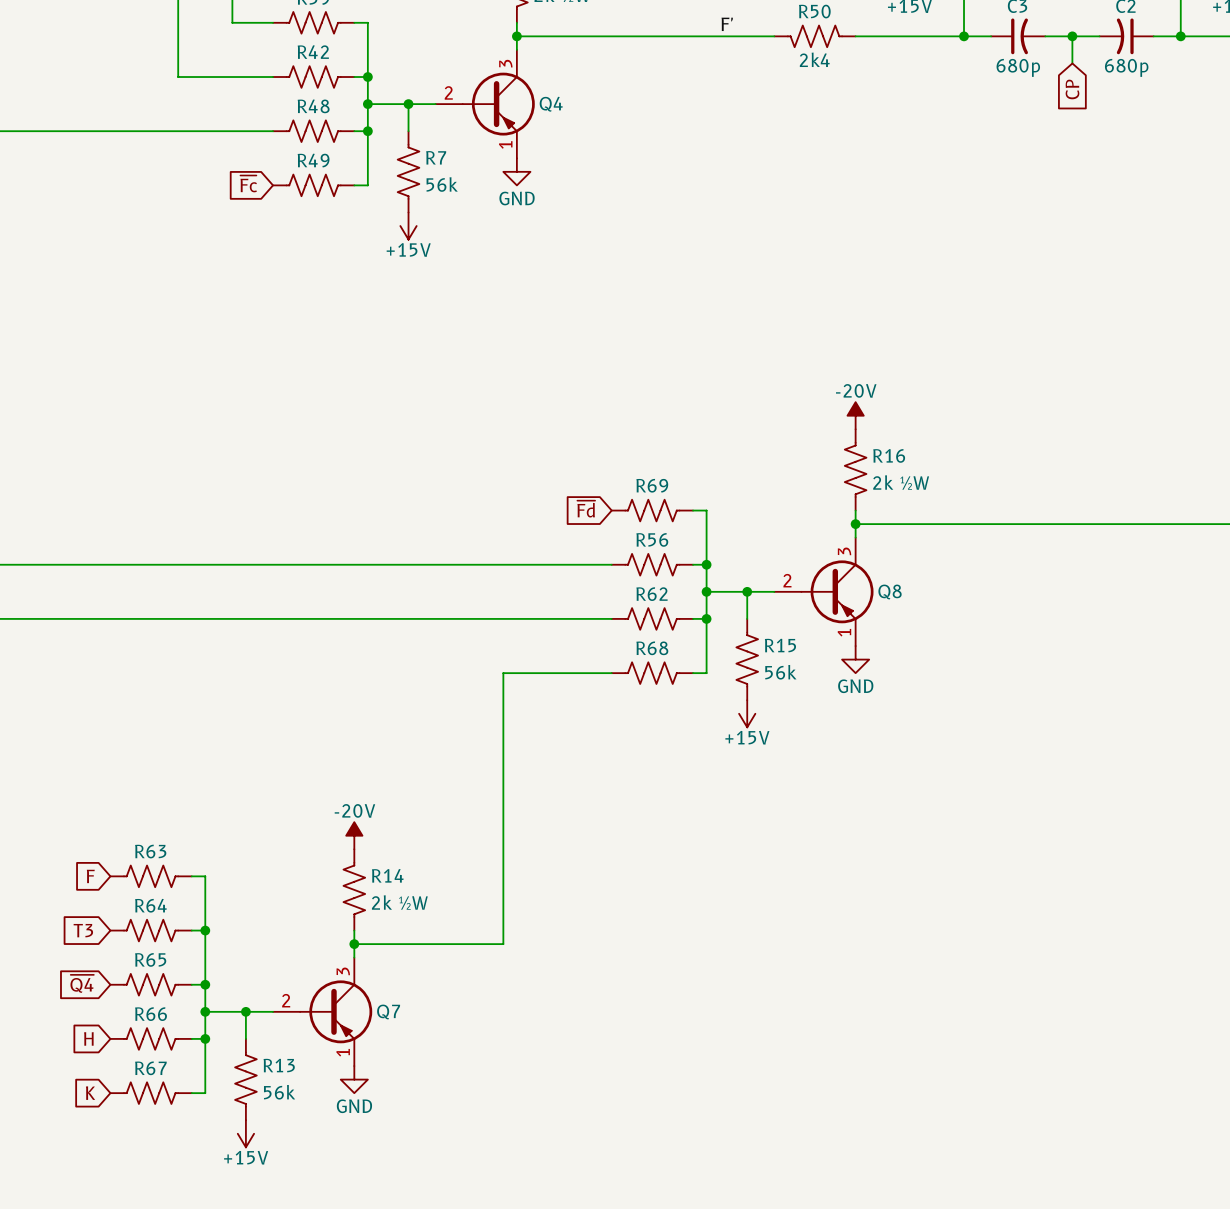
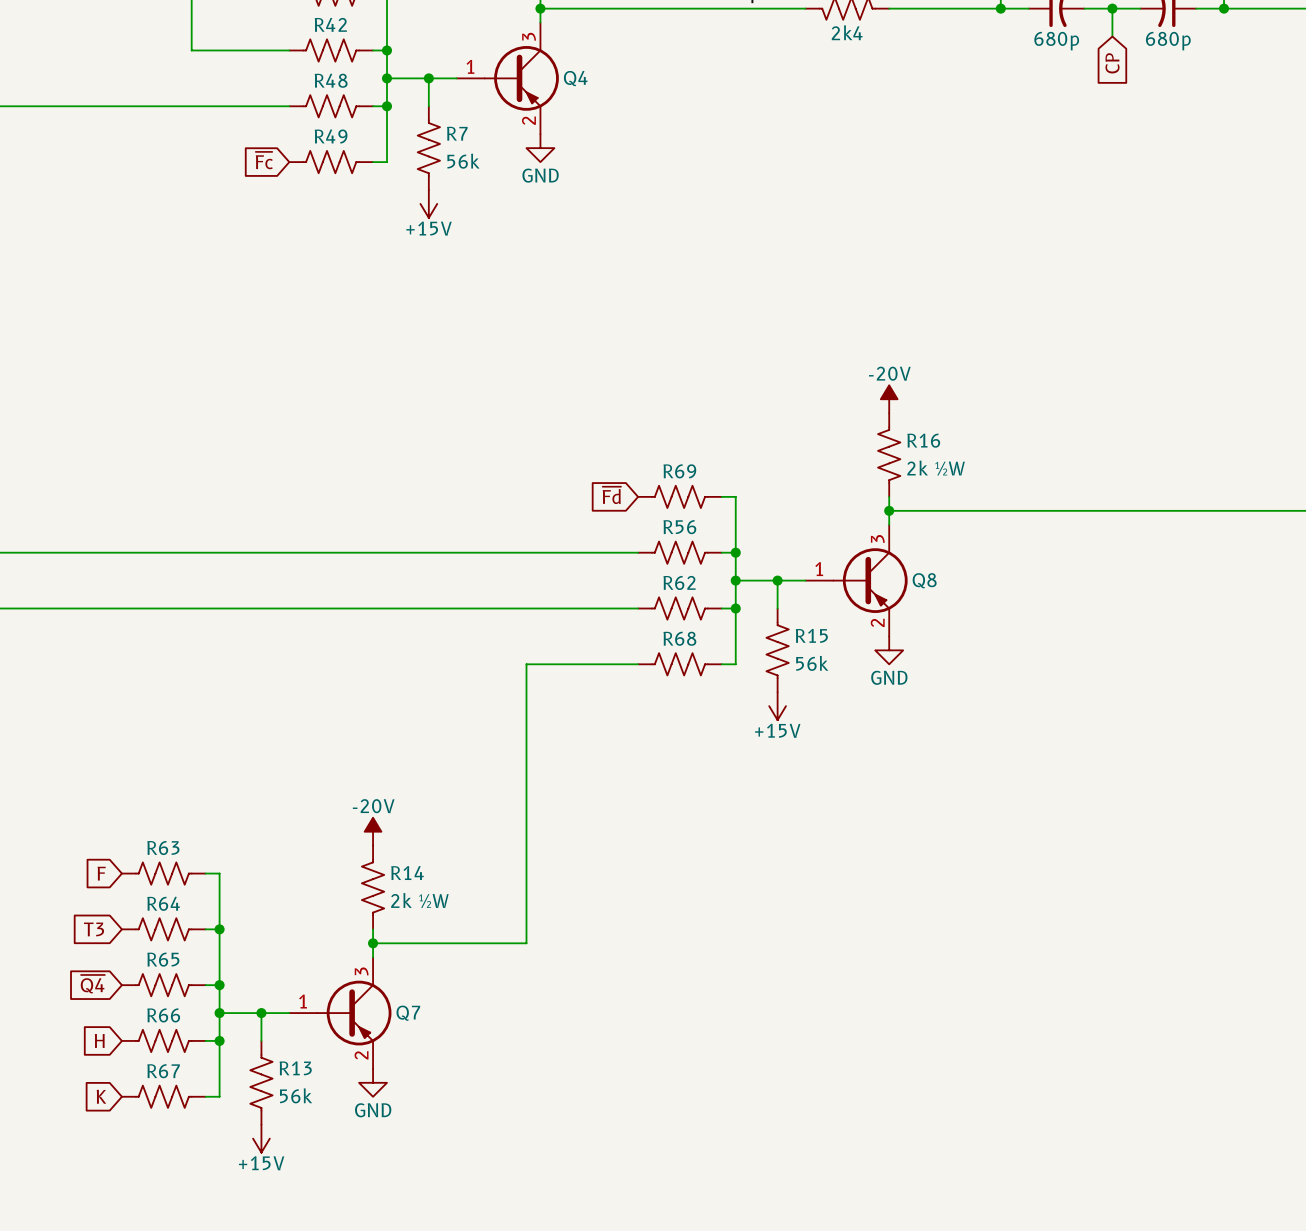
Q4 pin number: 2 (448, 92) -> 1 (470, 66)
Q4 pin number: 1 (505, 144) -> 2 (528, 120)
Q8 pin number: 2 (787, 580) -> 1 (819, 569)
Q8 pin number: 1 (844, 632) -> 2 (877, 622)
Q7 pin number: 2 (286, 1000) -> 1 (303, 1001)
Q7 pin number: 1 (343, 1052) -> 2 (361, 1055)

